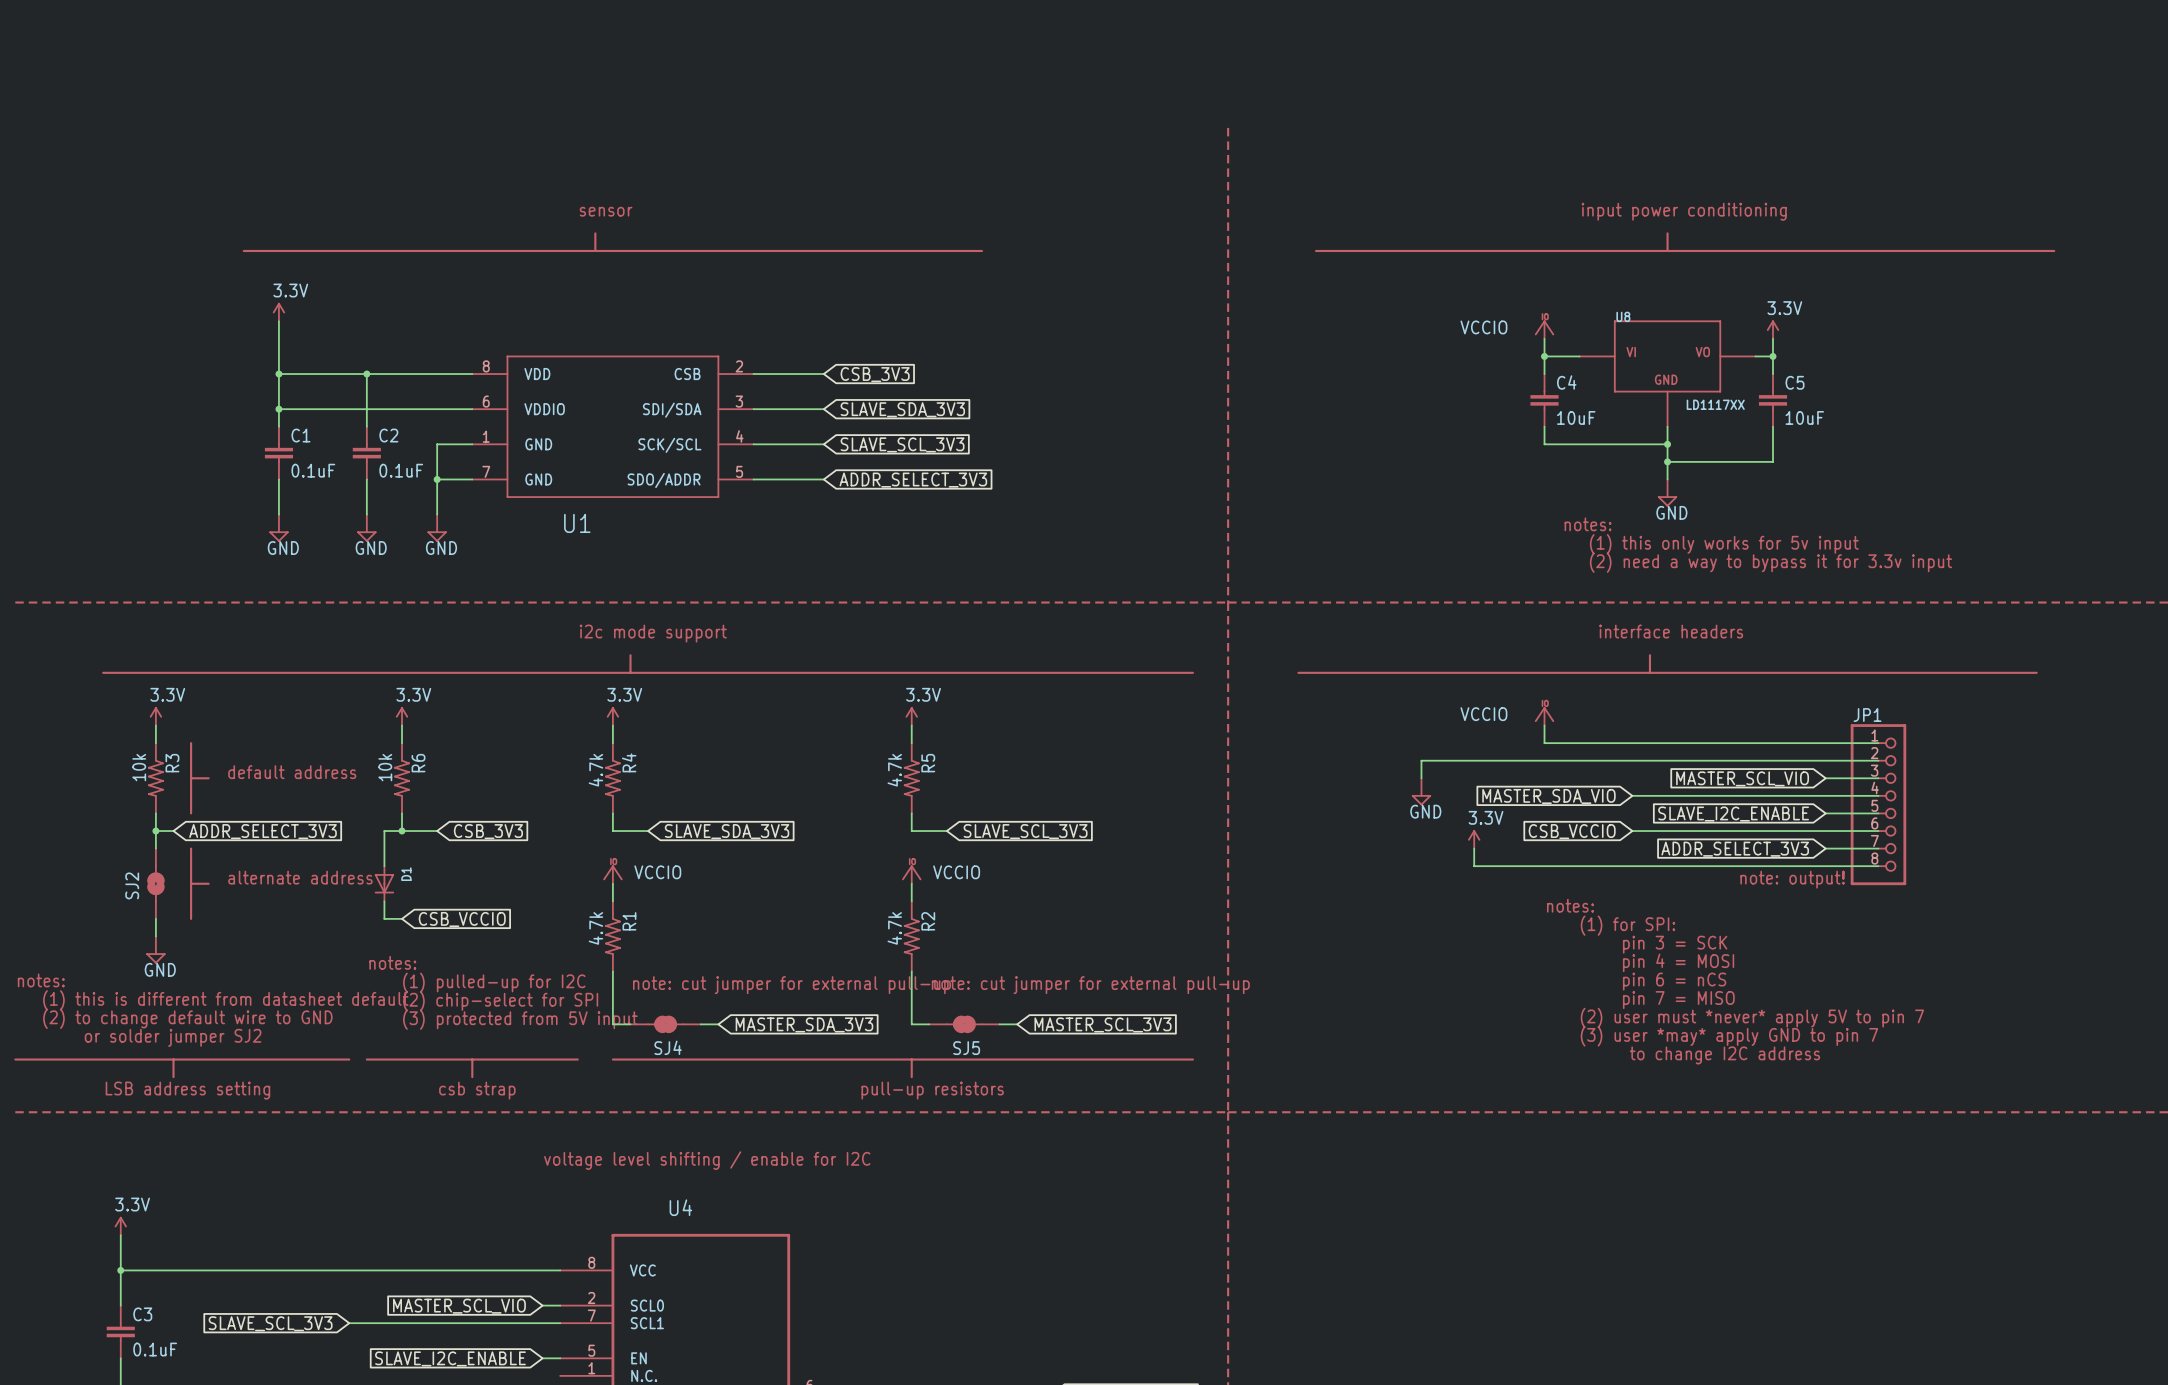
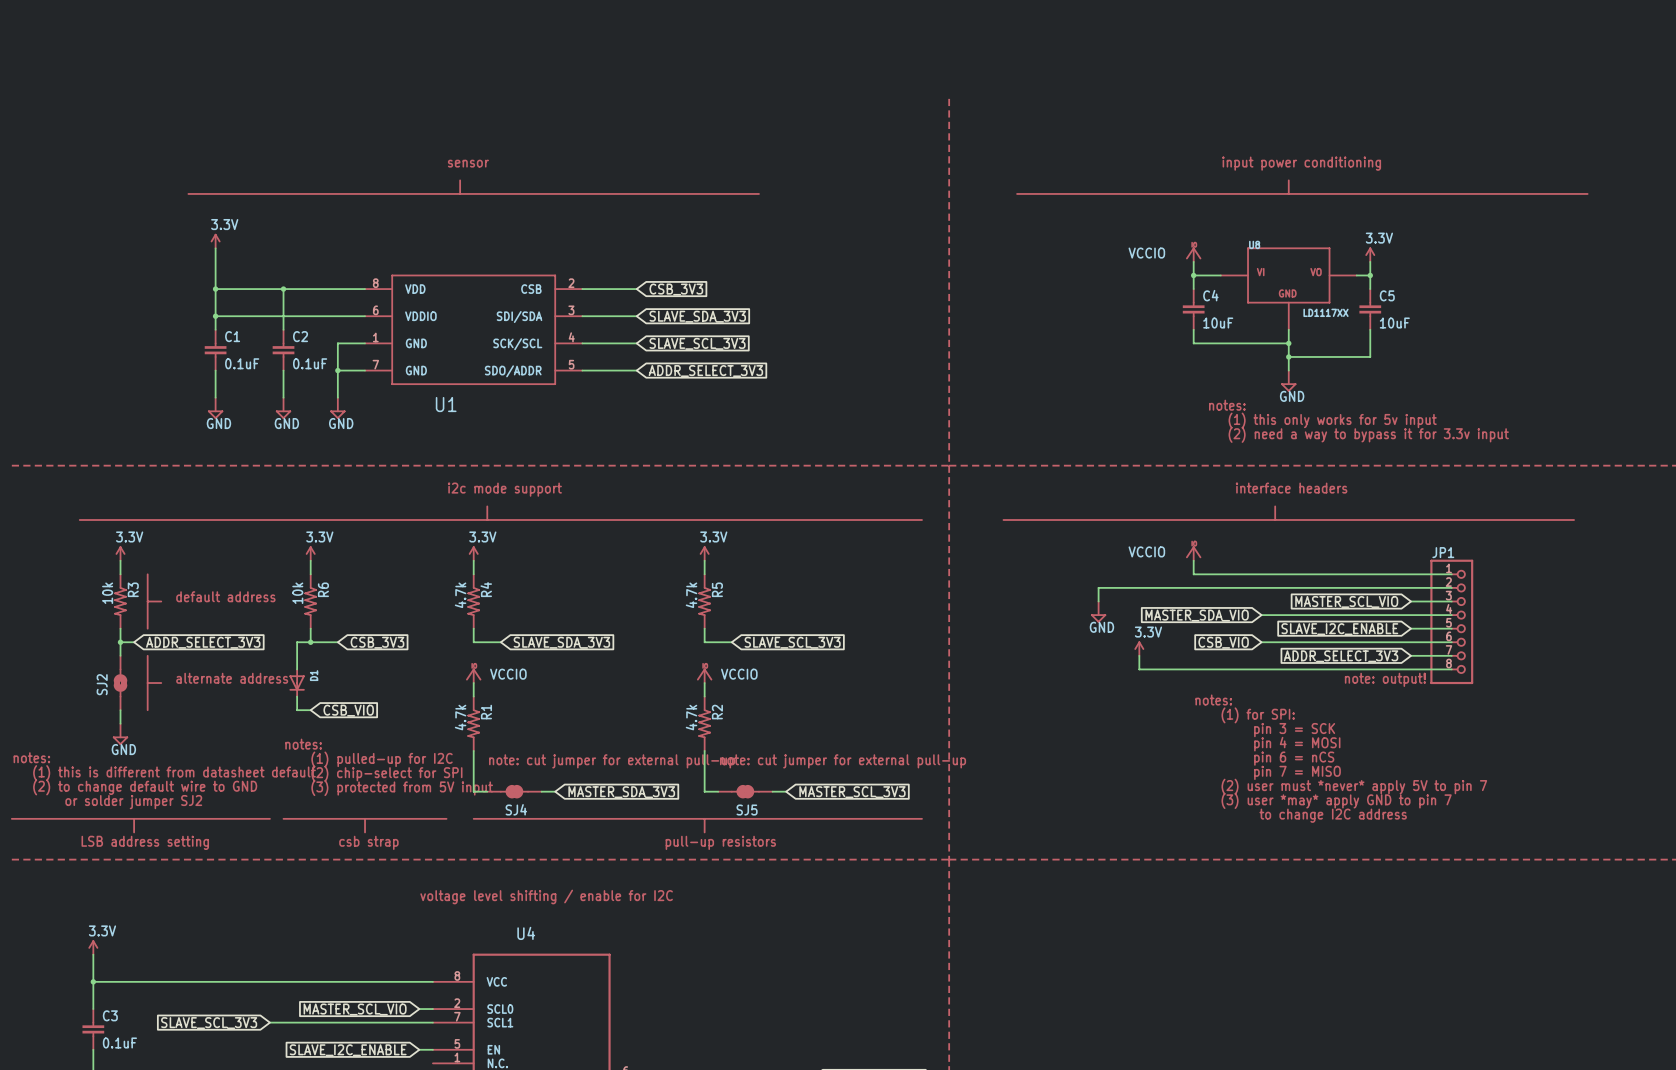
global label: CSB_VCCIO (1572, 831) -> CSB_VIO (1223, 642)
global label: CSB_VCCIO (462, 919) -> CSB_VIO (348, 710)

